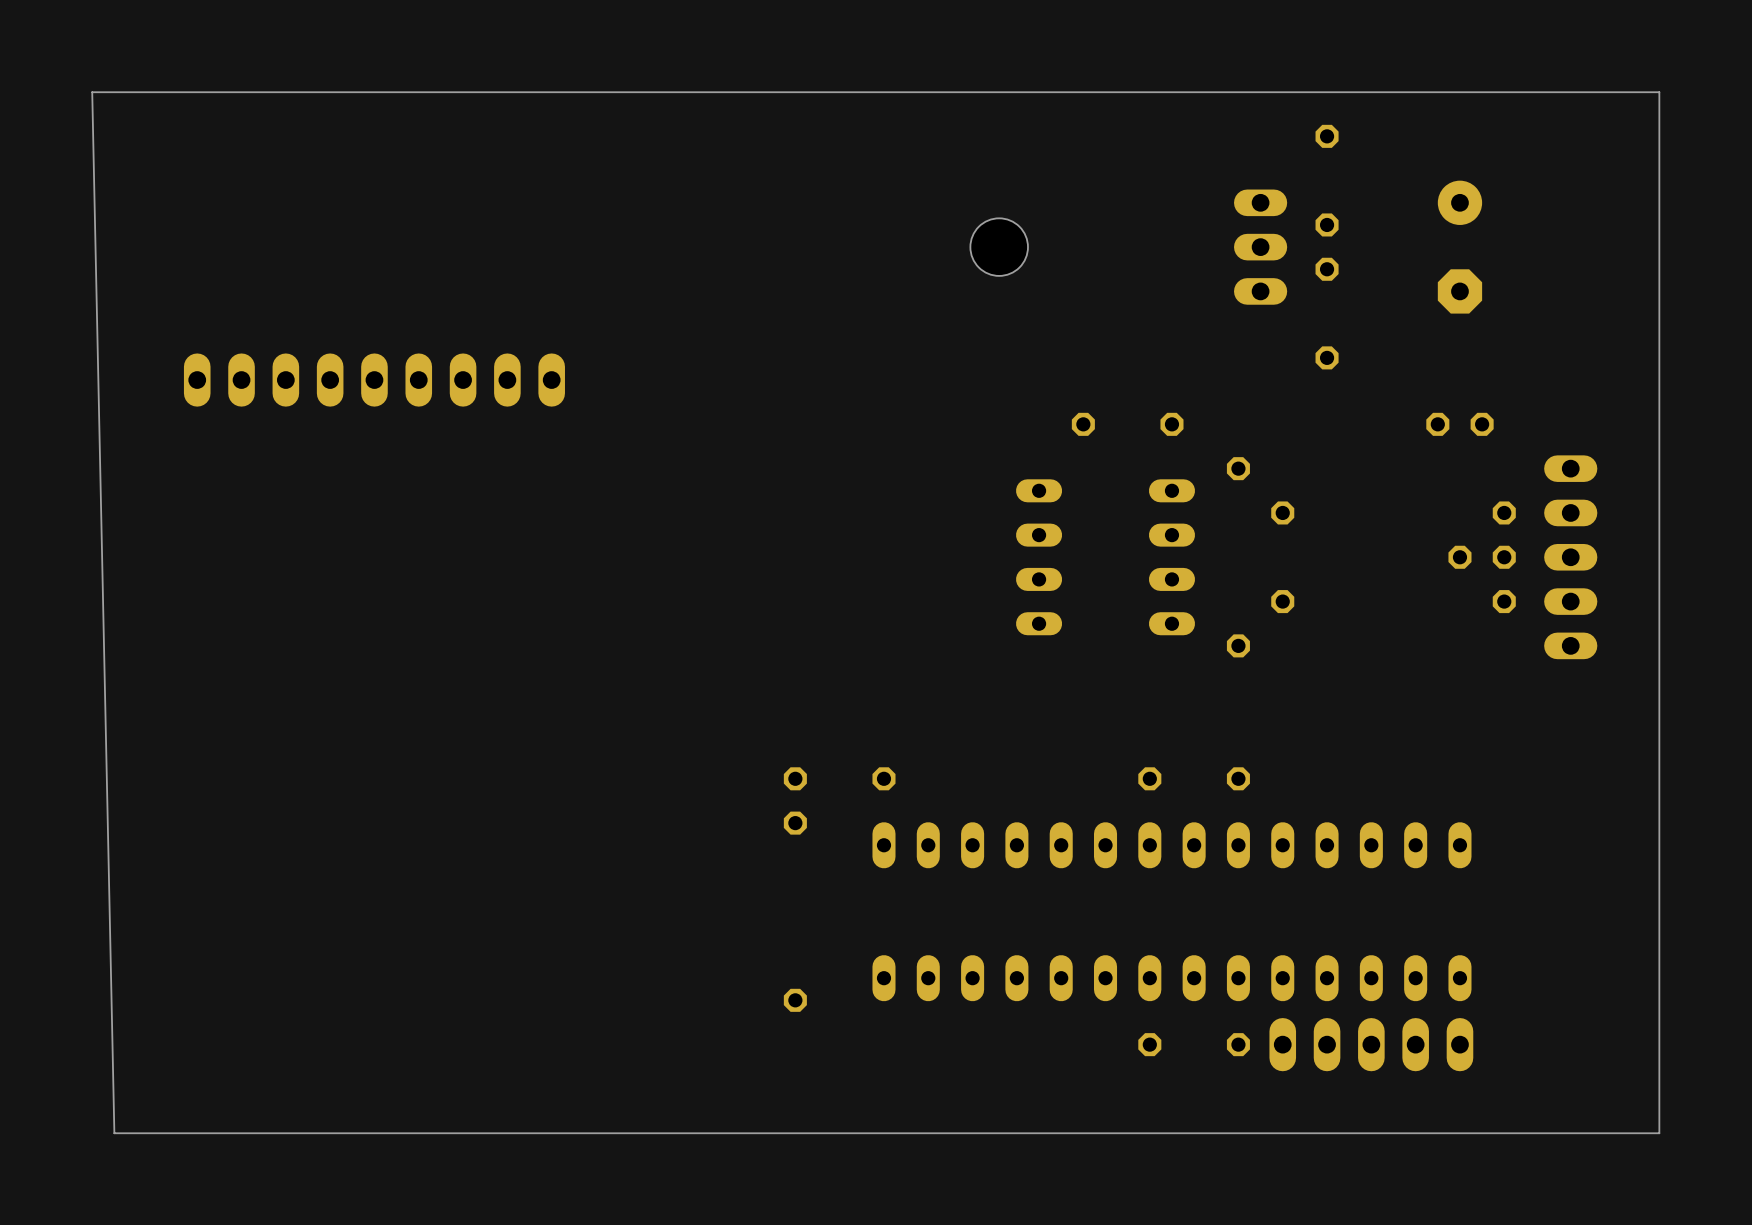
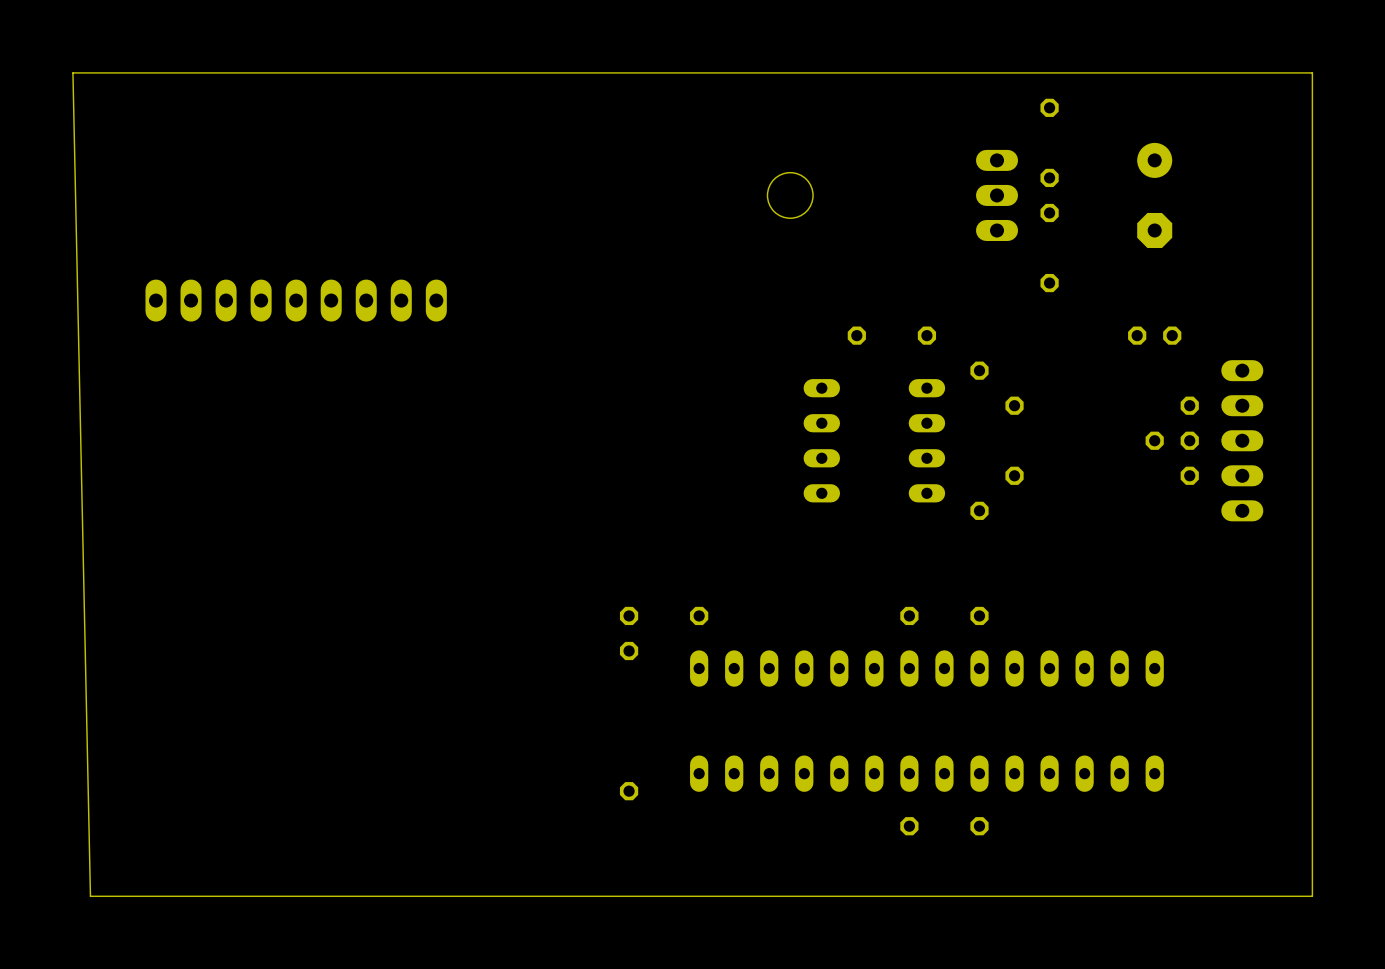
part: (1371, 1044) -> none

